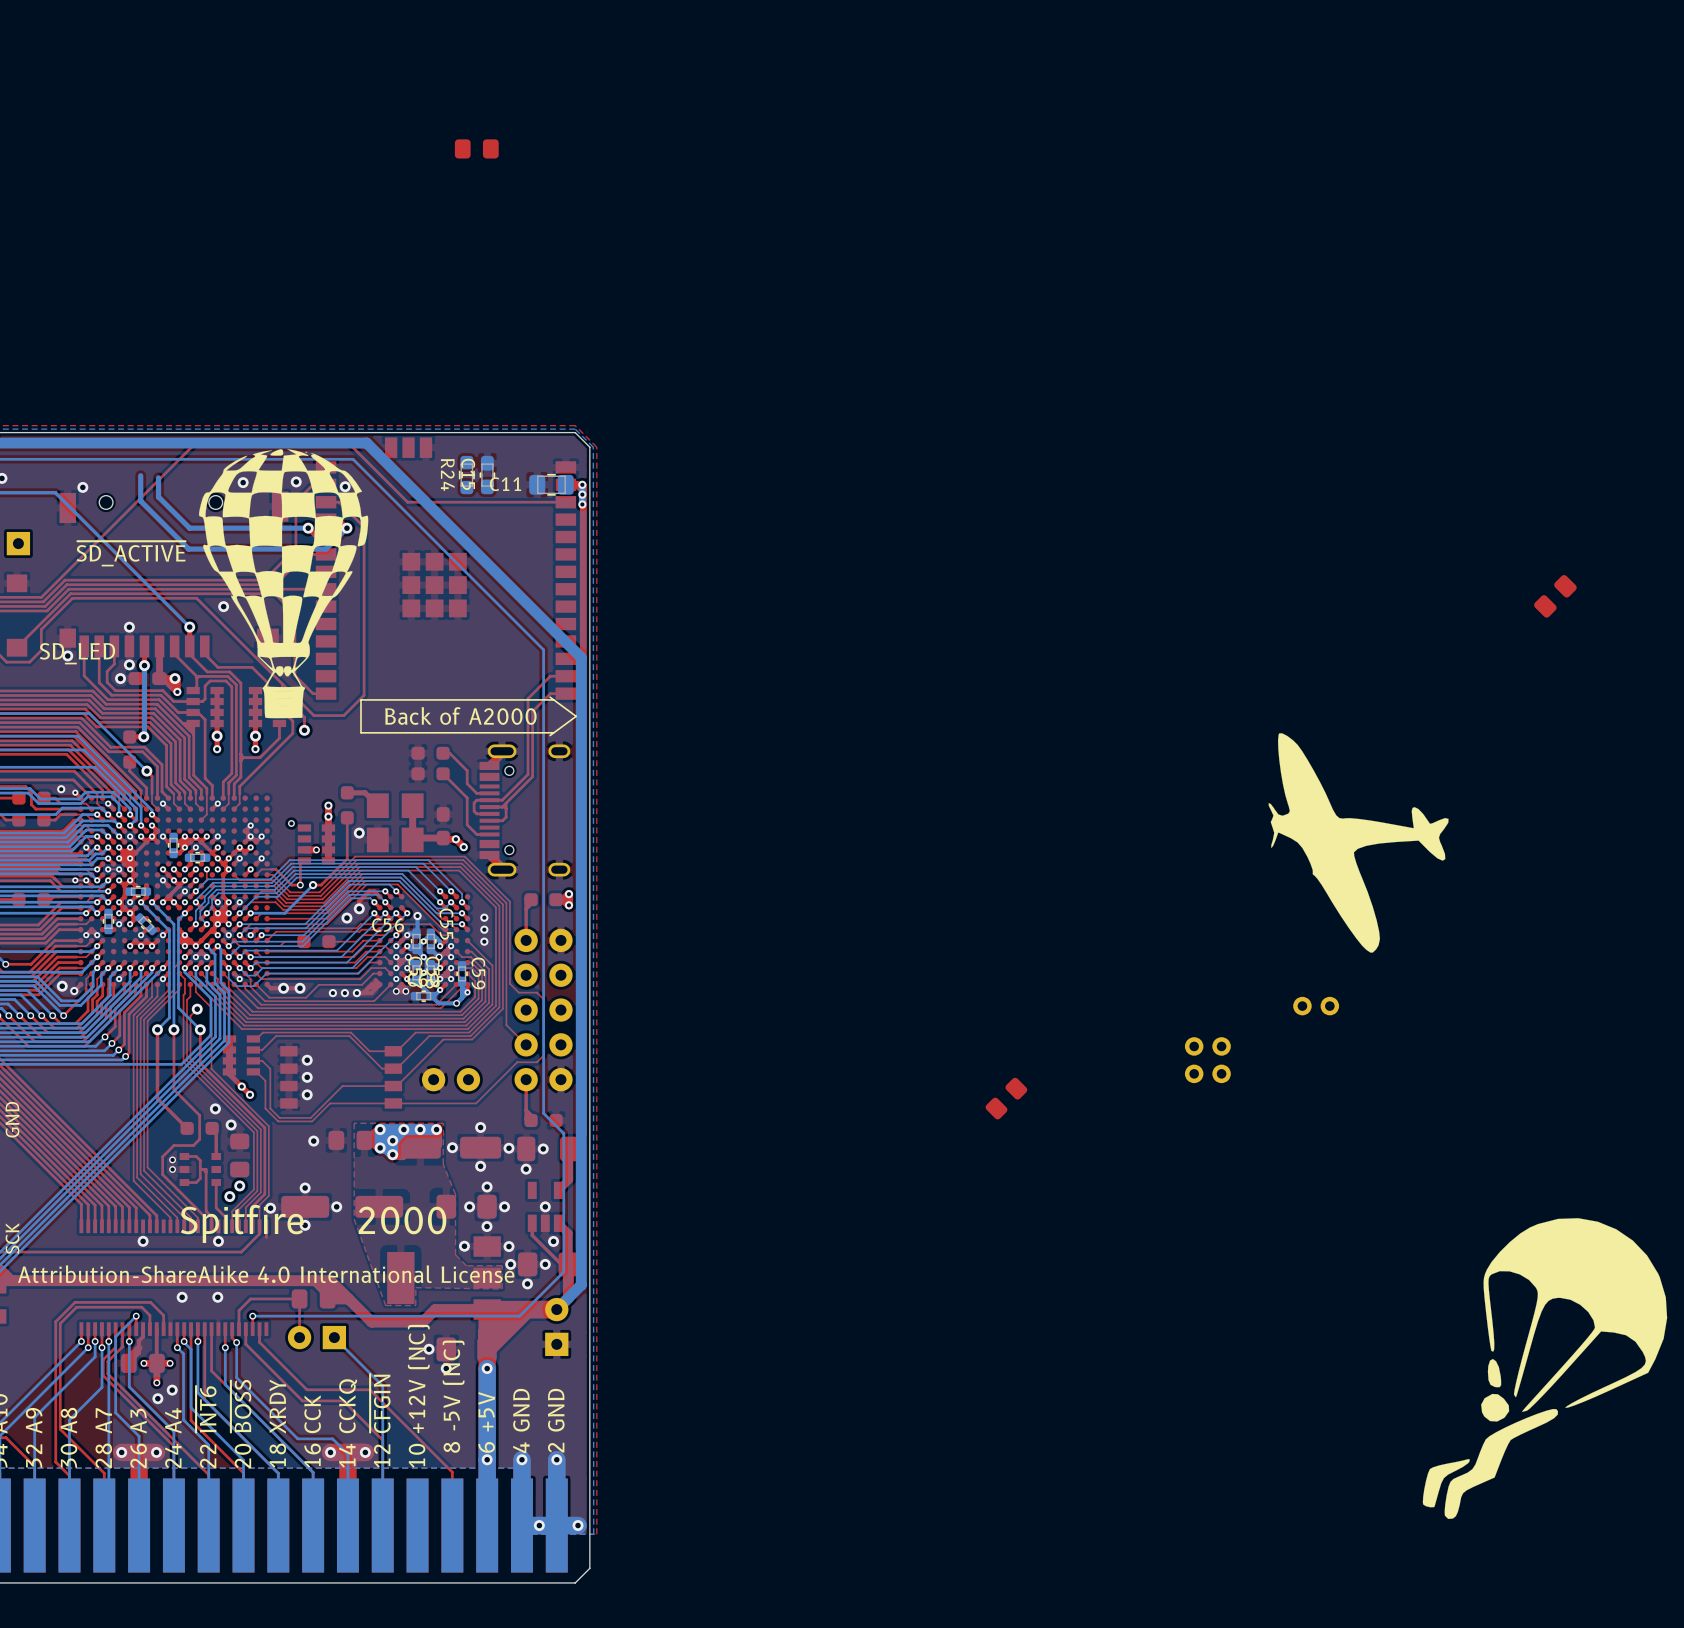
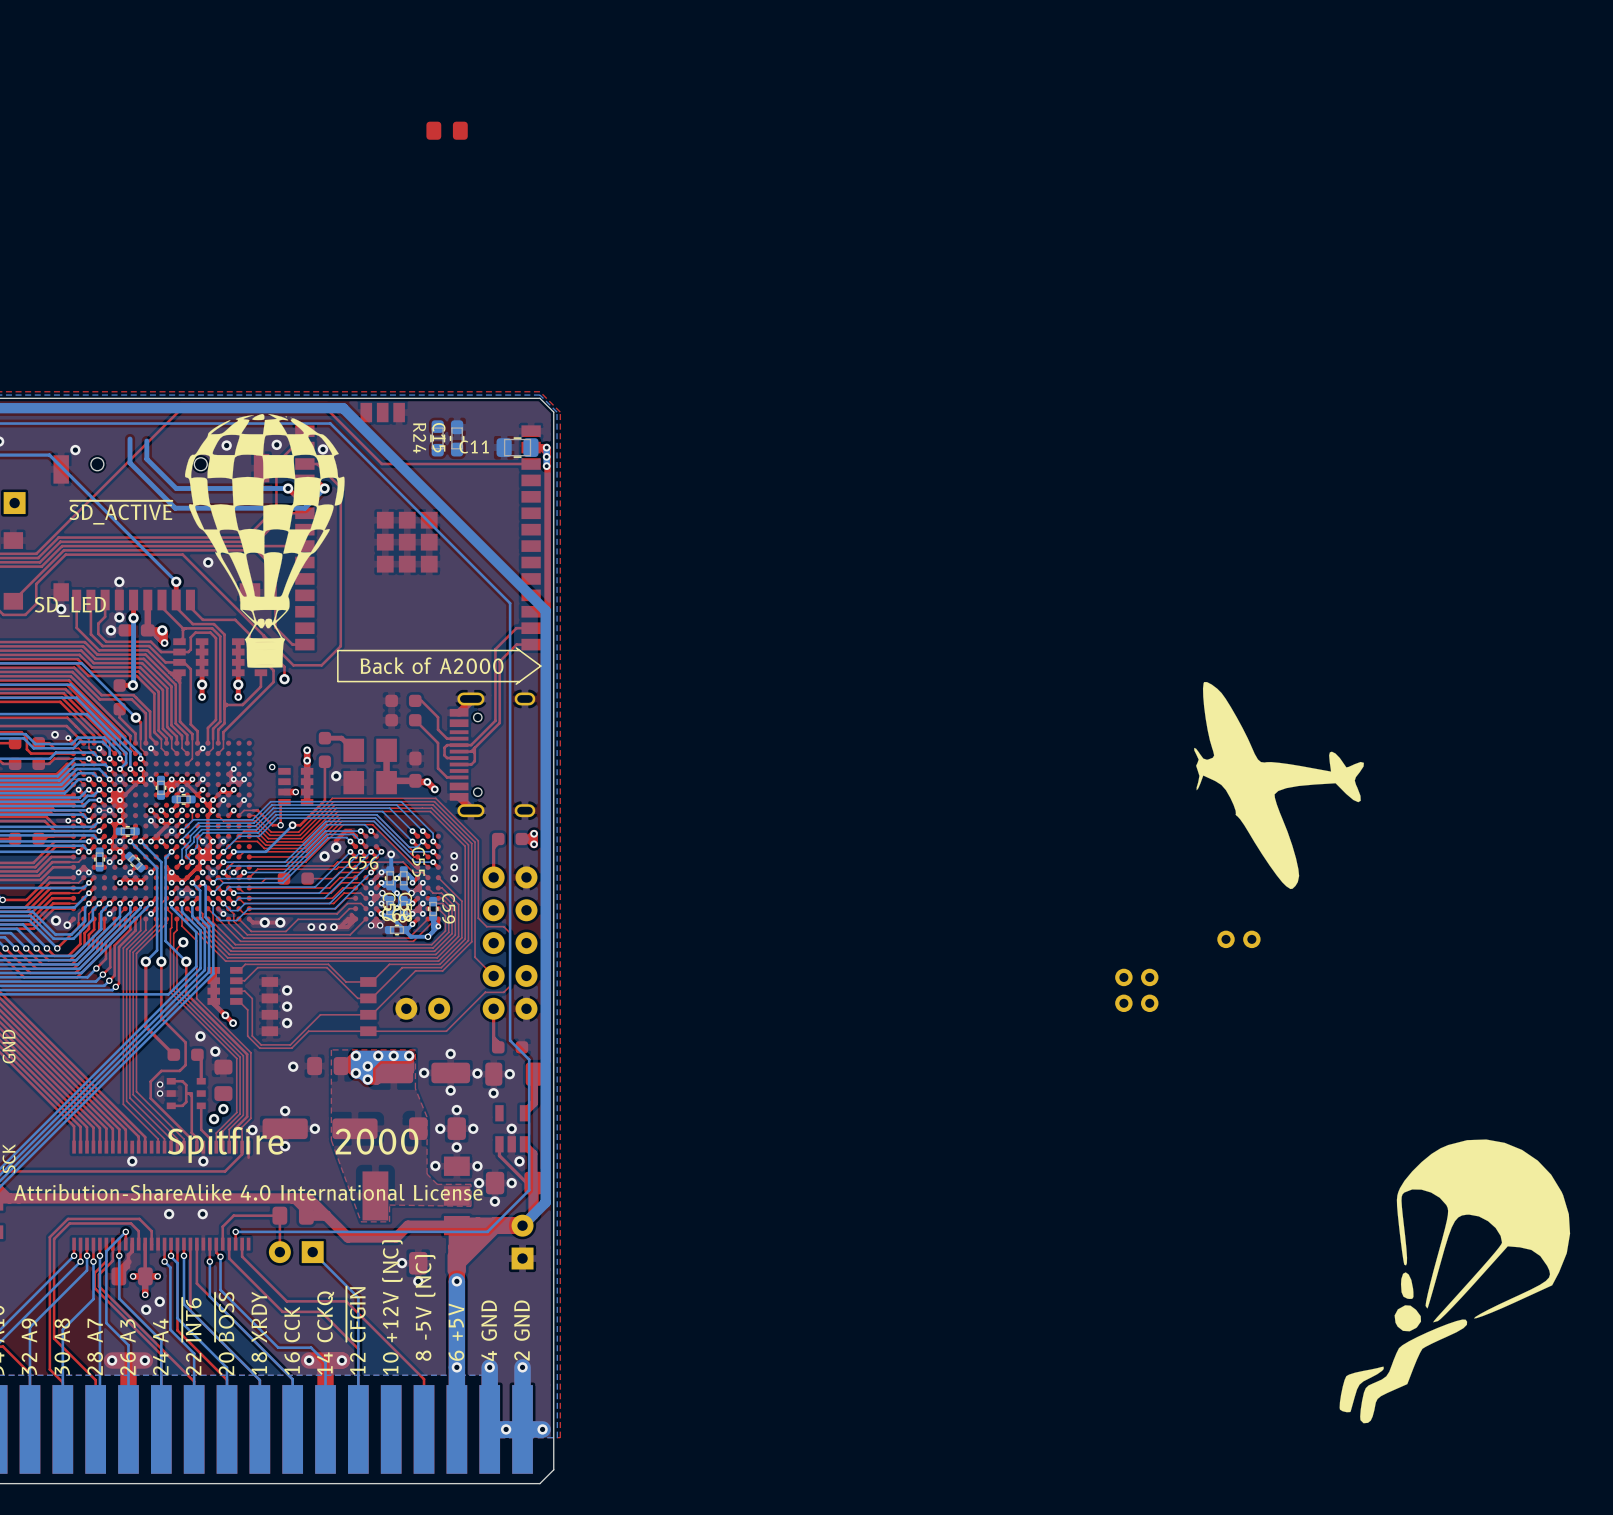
part: (1555, 596) -> none
part: (1006, 1098) -> none

